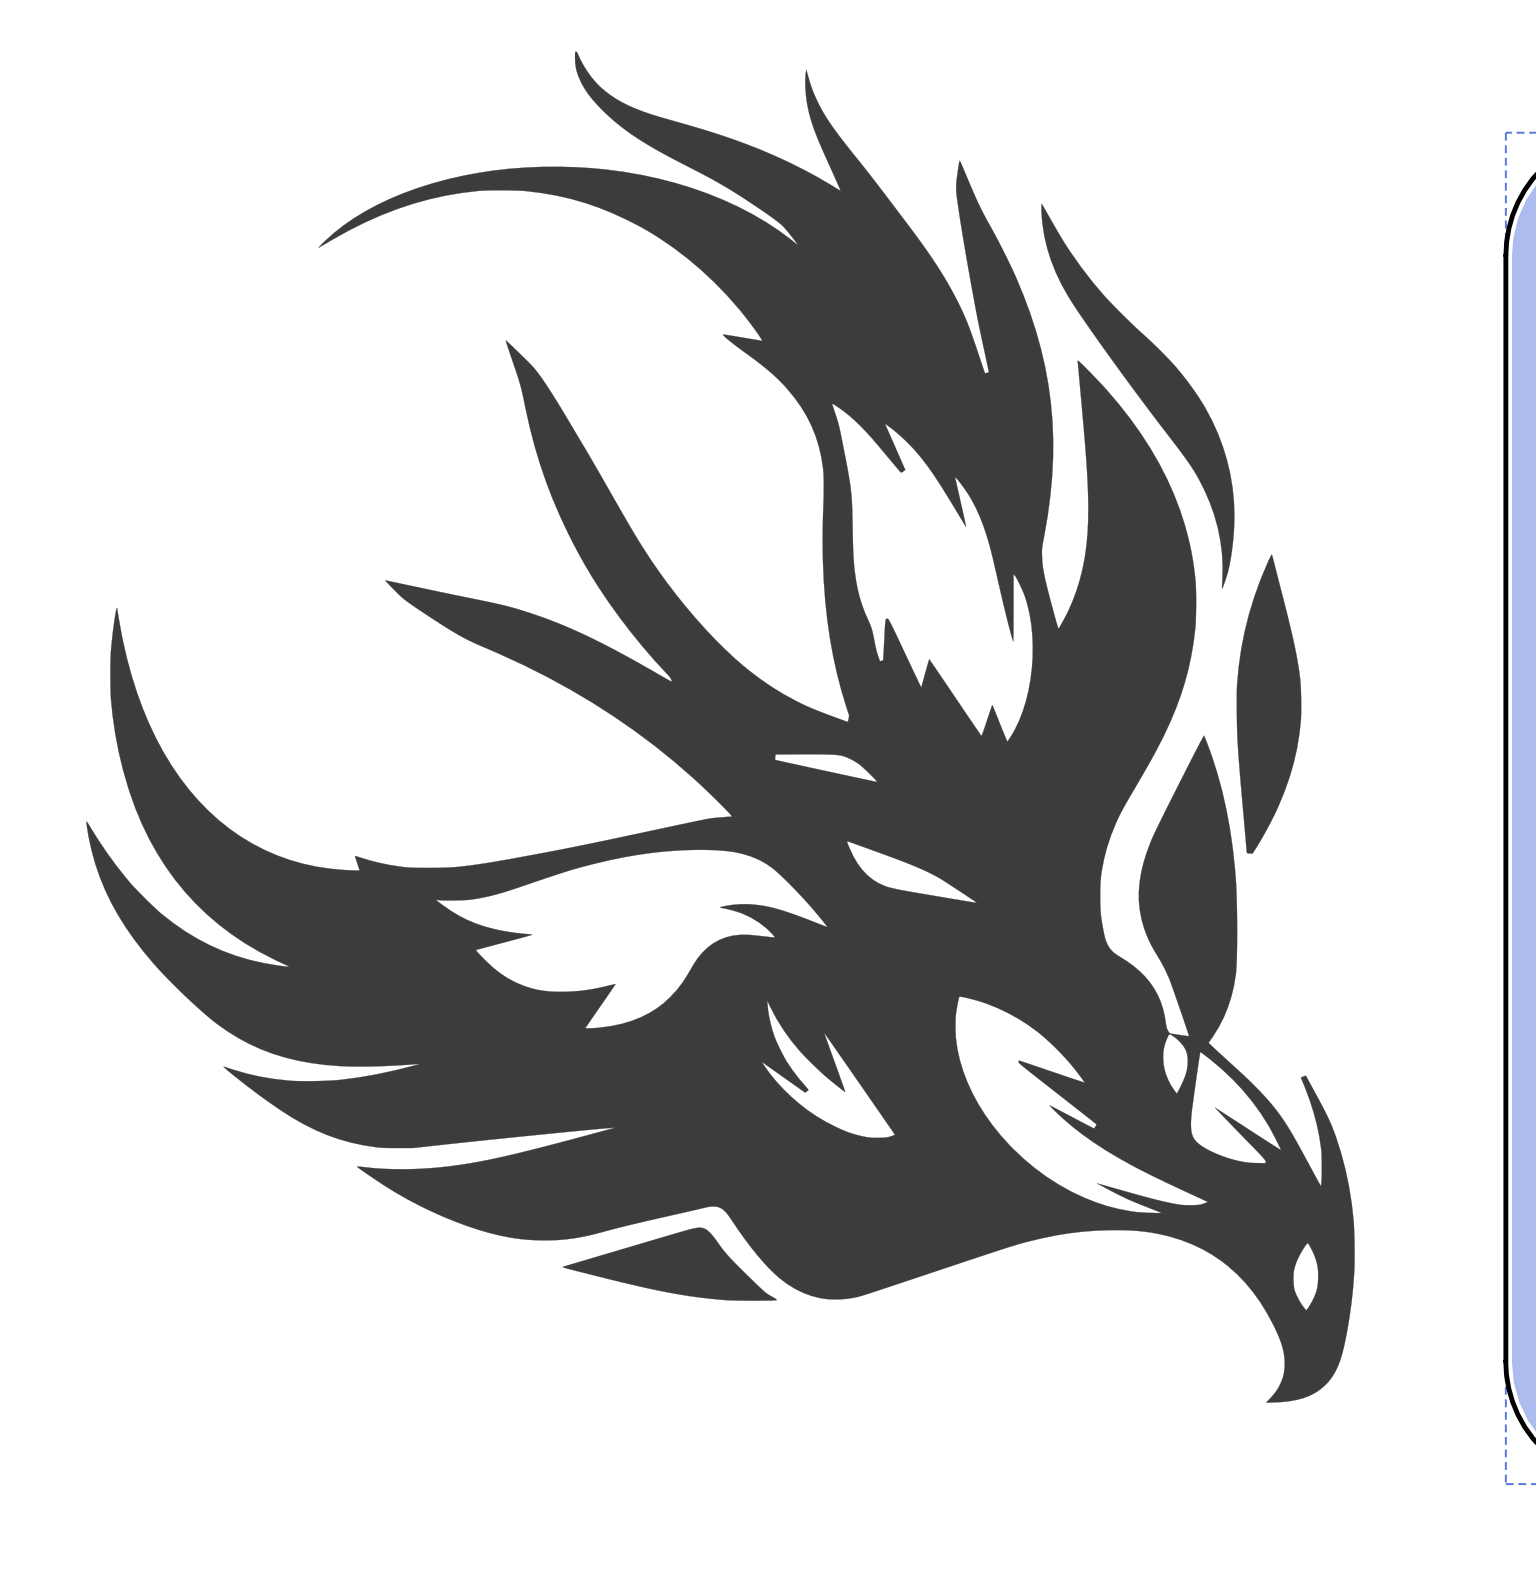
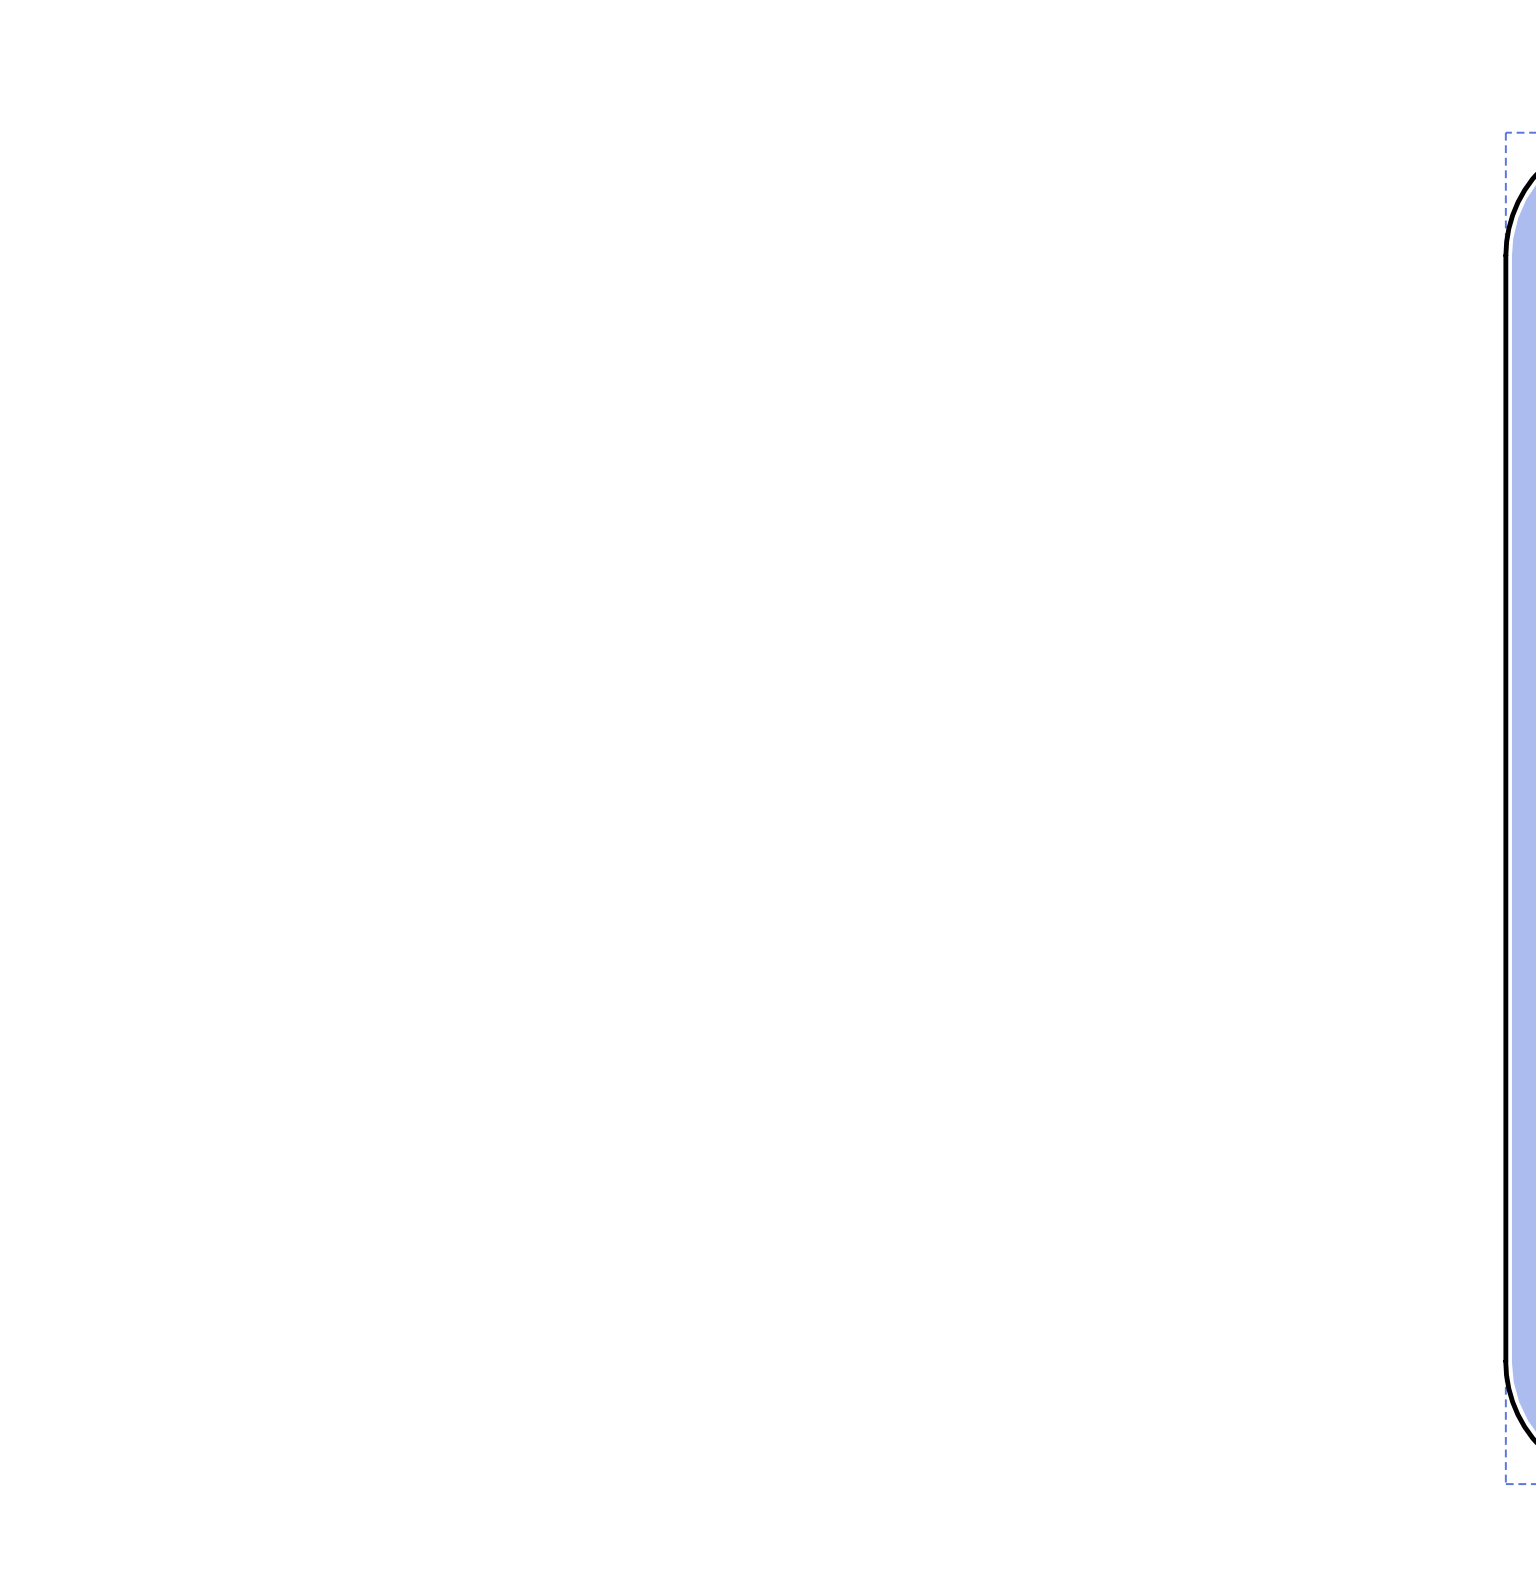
drawing: [86, 51, 1355, 1403] -> none

